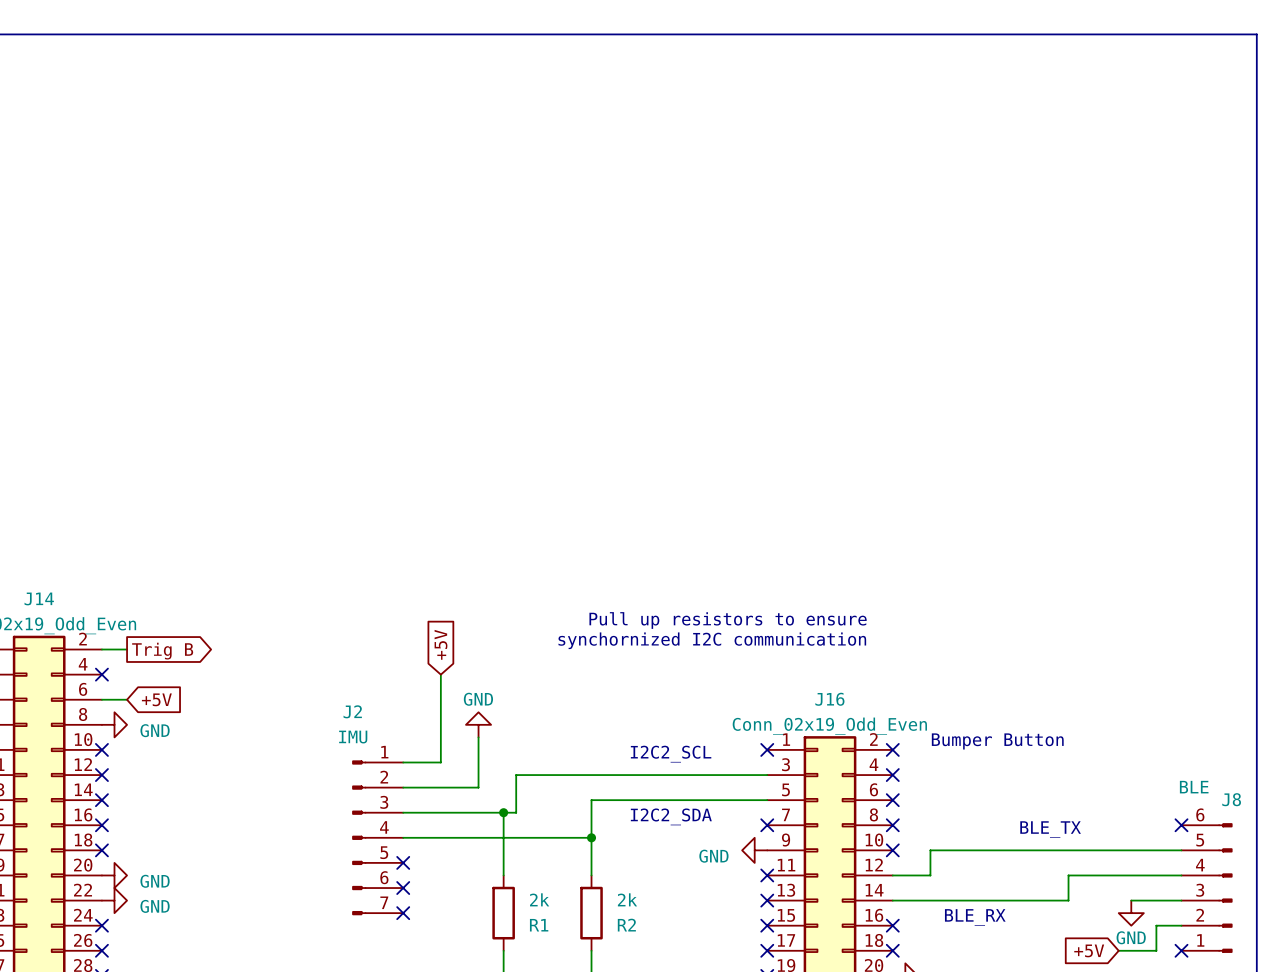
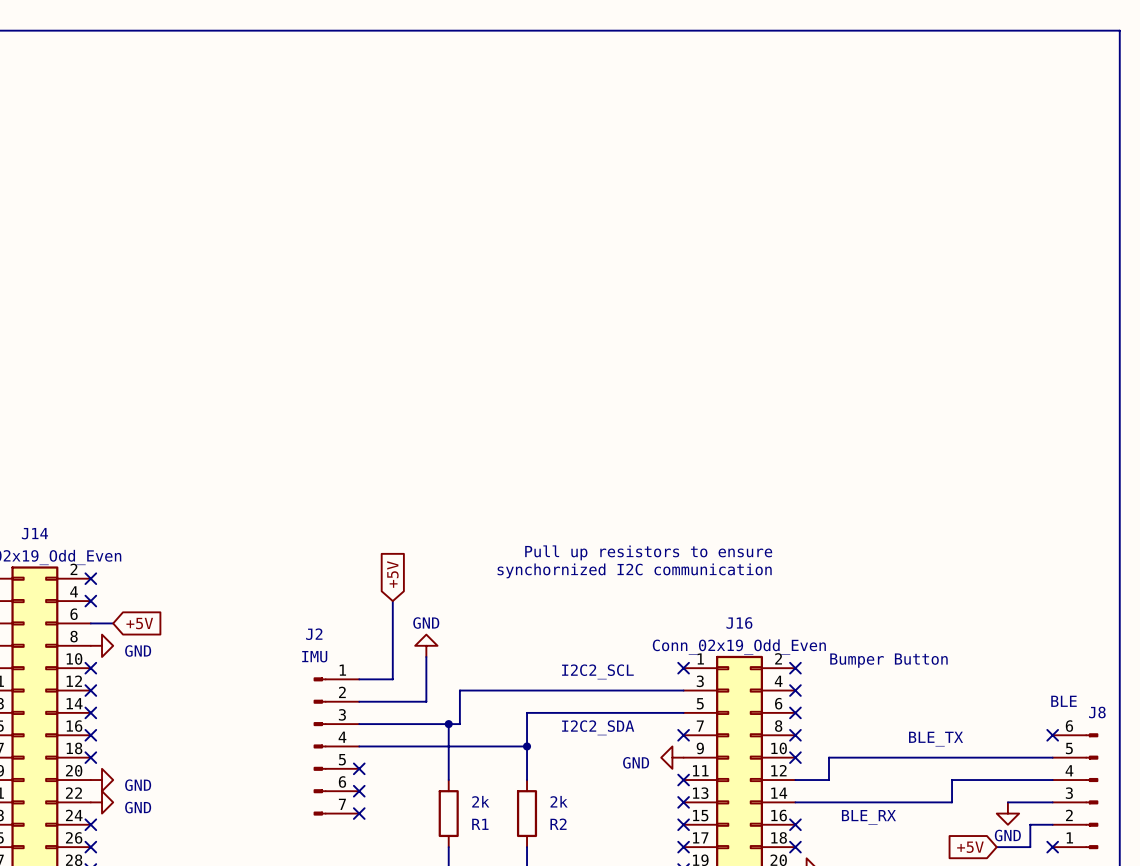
wire: (101, 649) (127, 649) -> none
no-connect mark: none -> (90, 578)
global label: Trig B (162, 651) -> none

